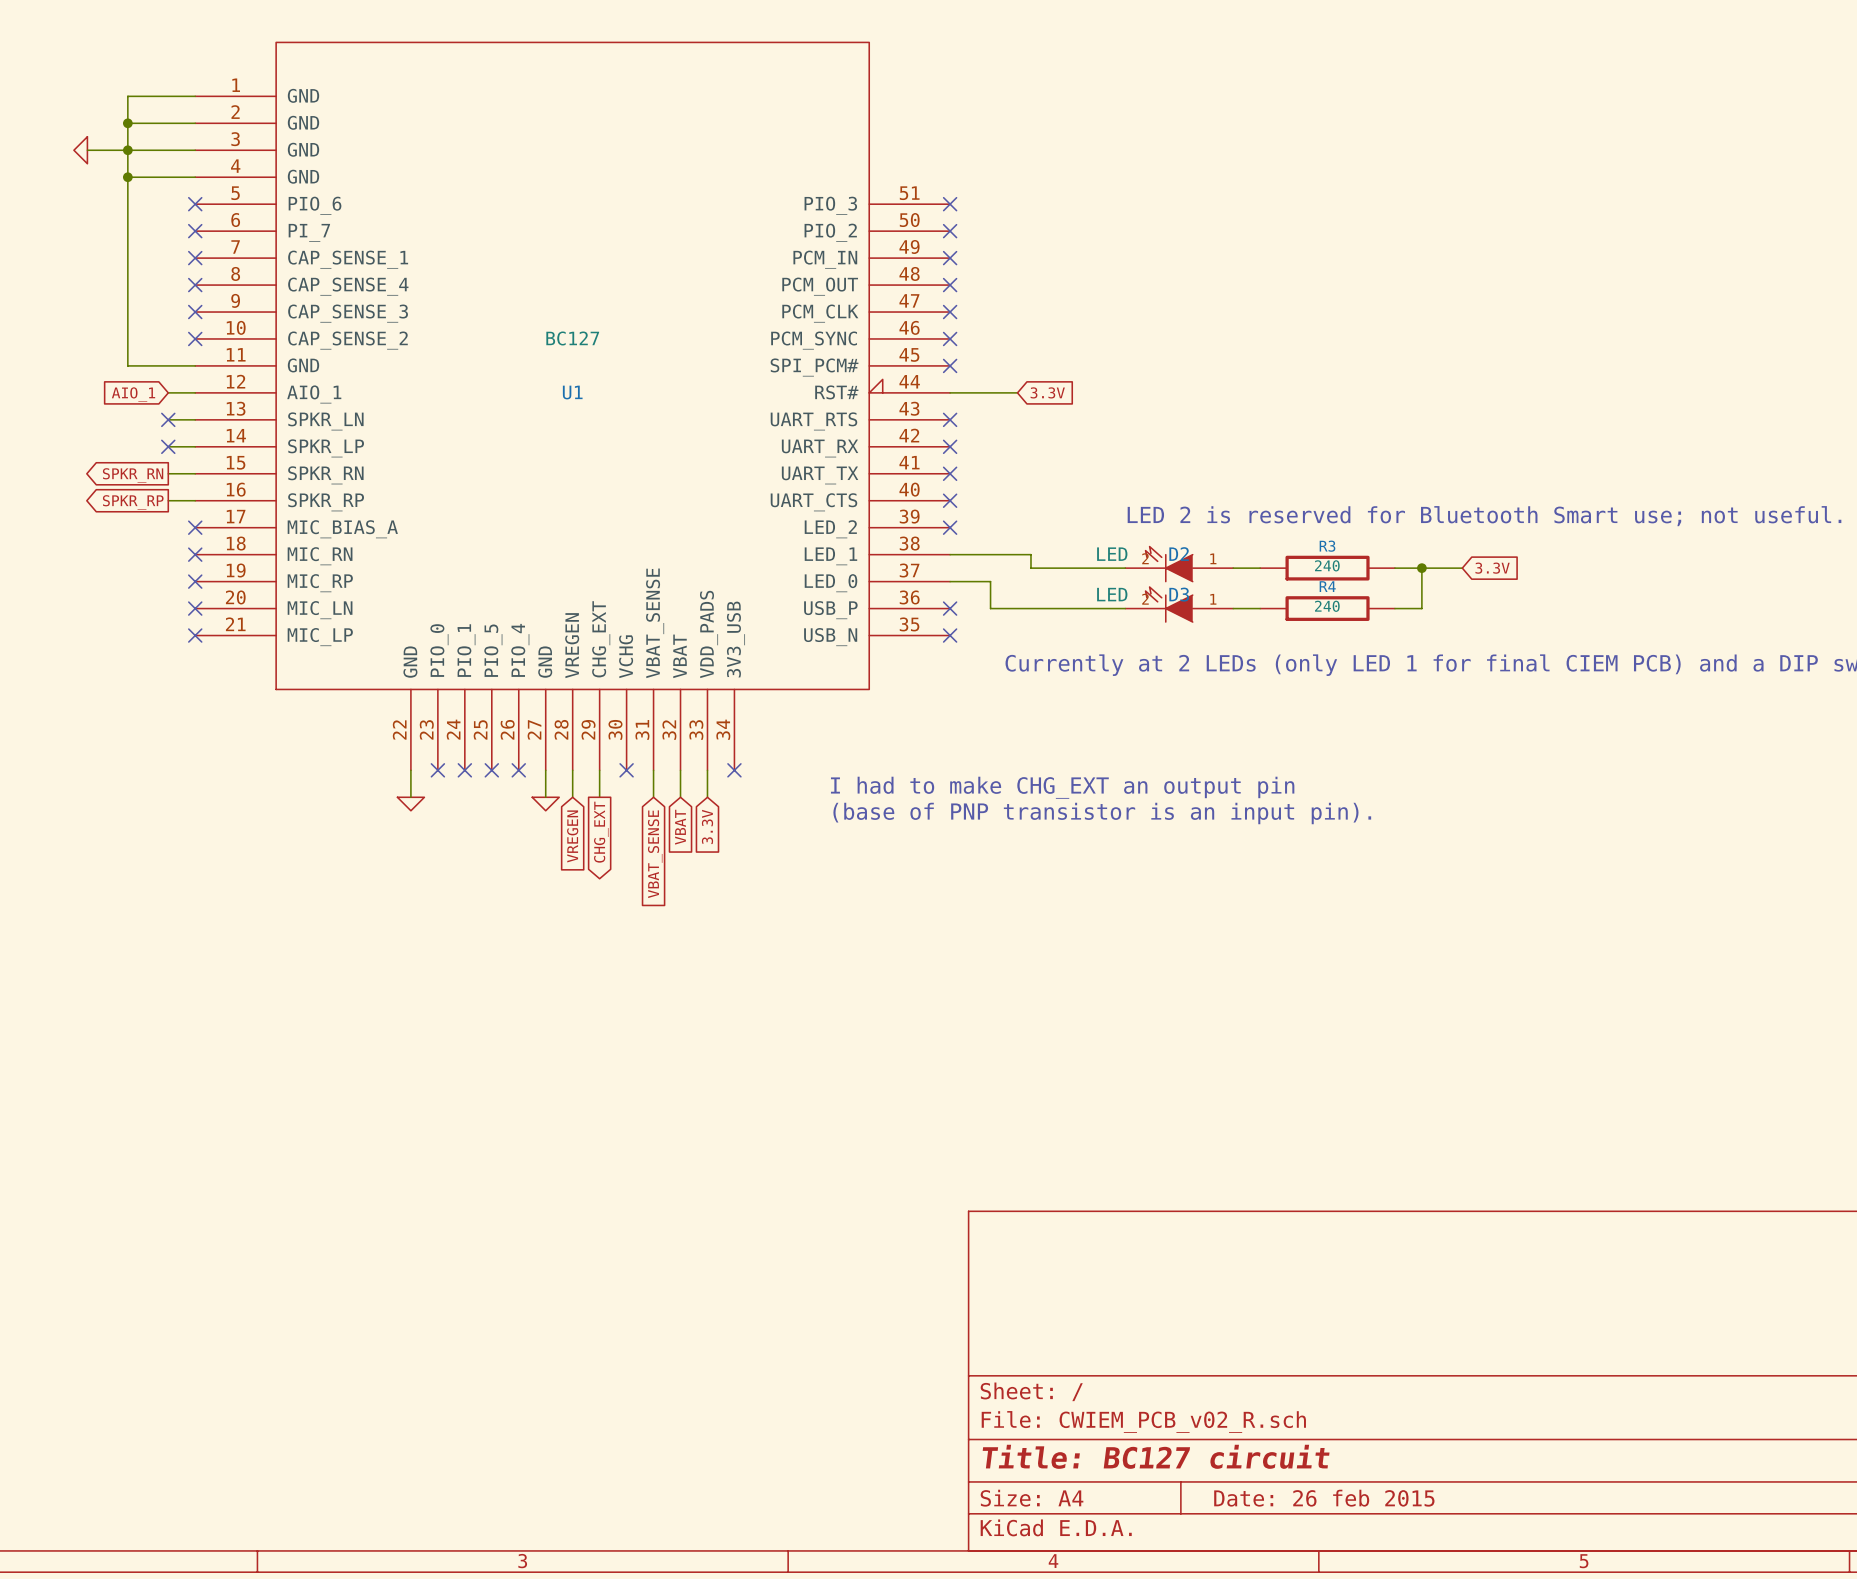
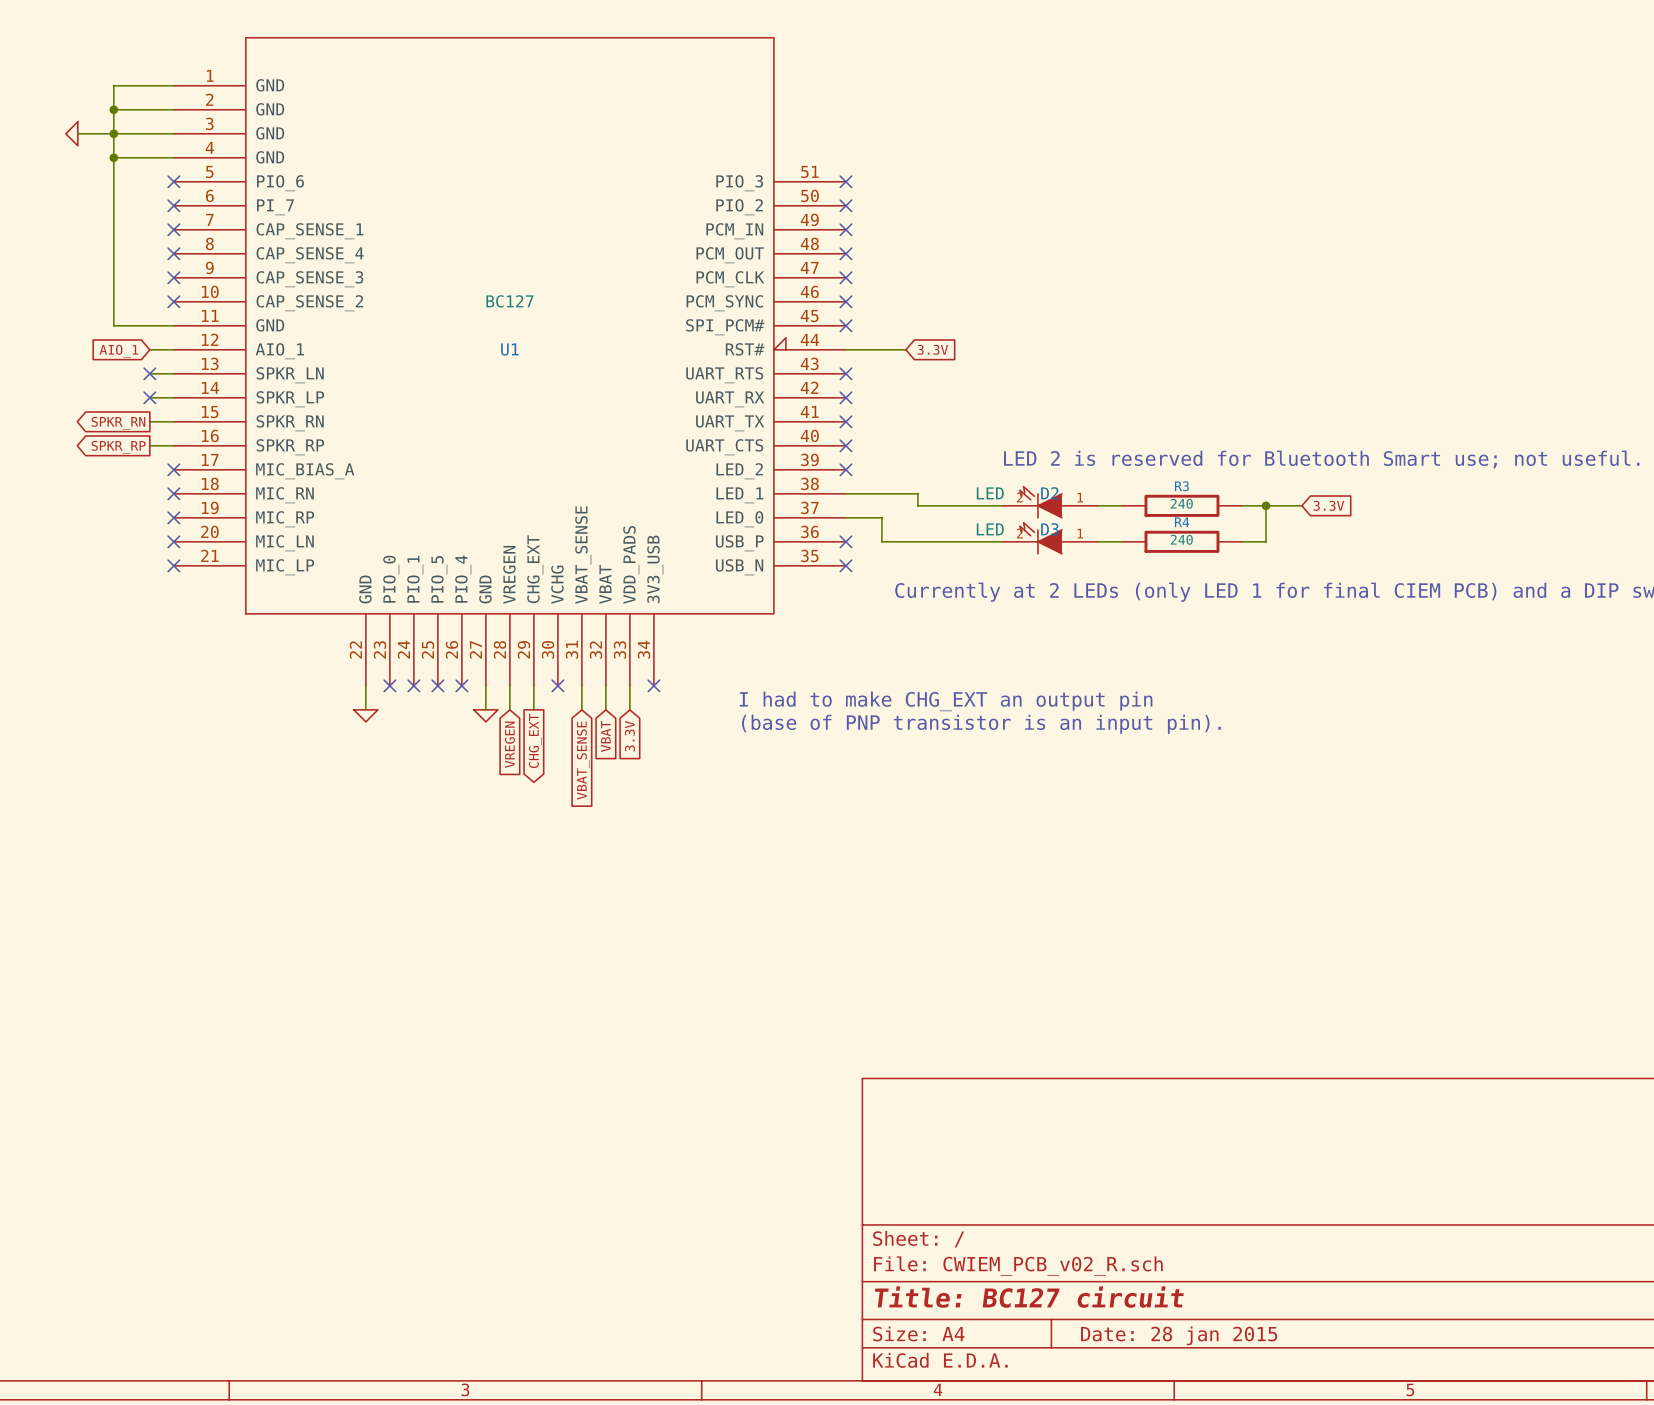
title block: Date: 26 feb 2015 (1324, 1498) -> Date: 28 jan 2015 (1179, 1335)

